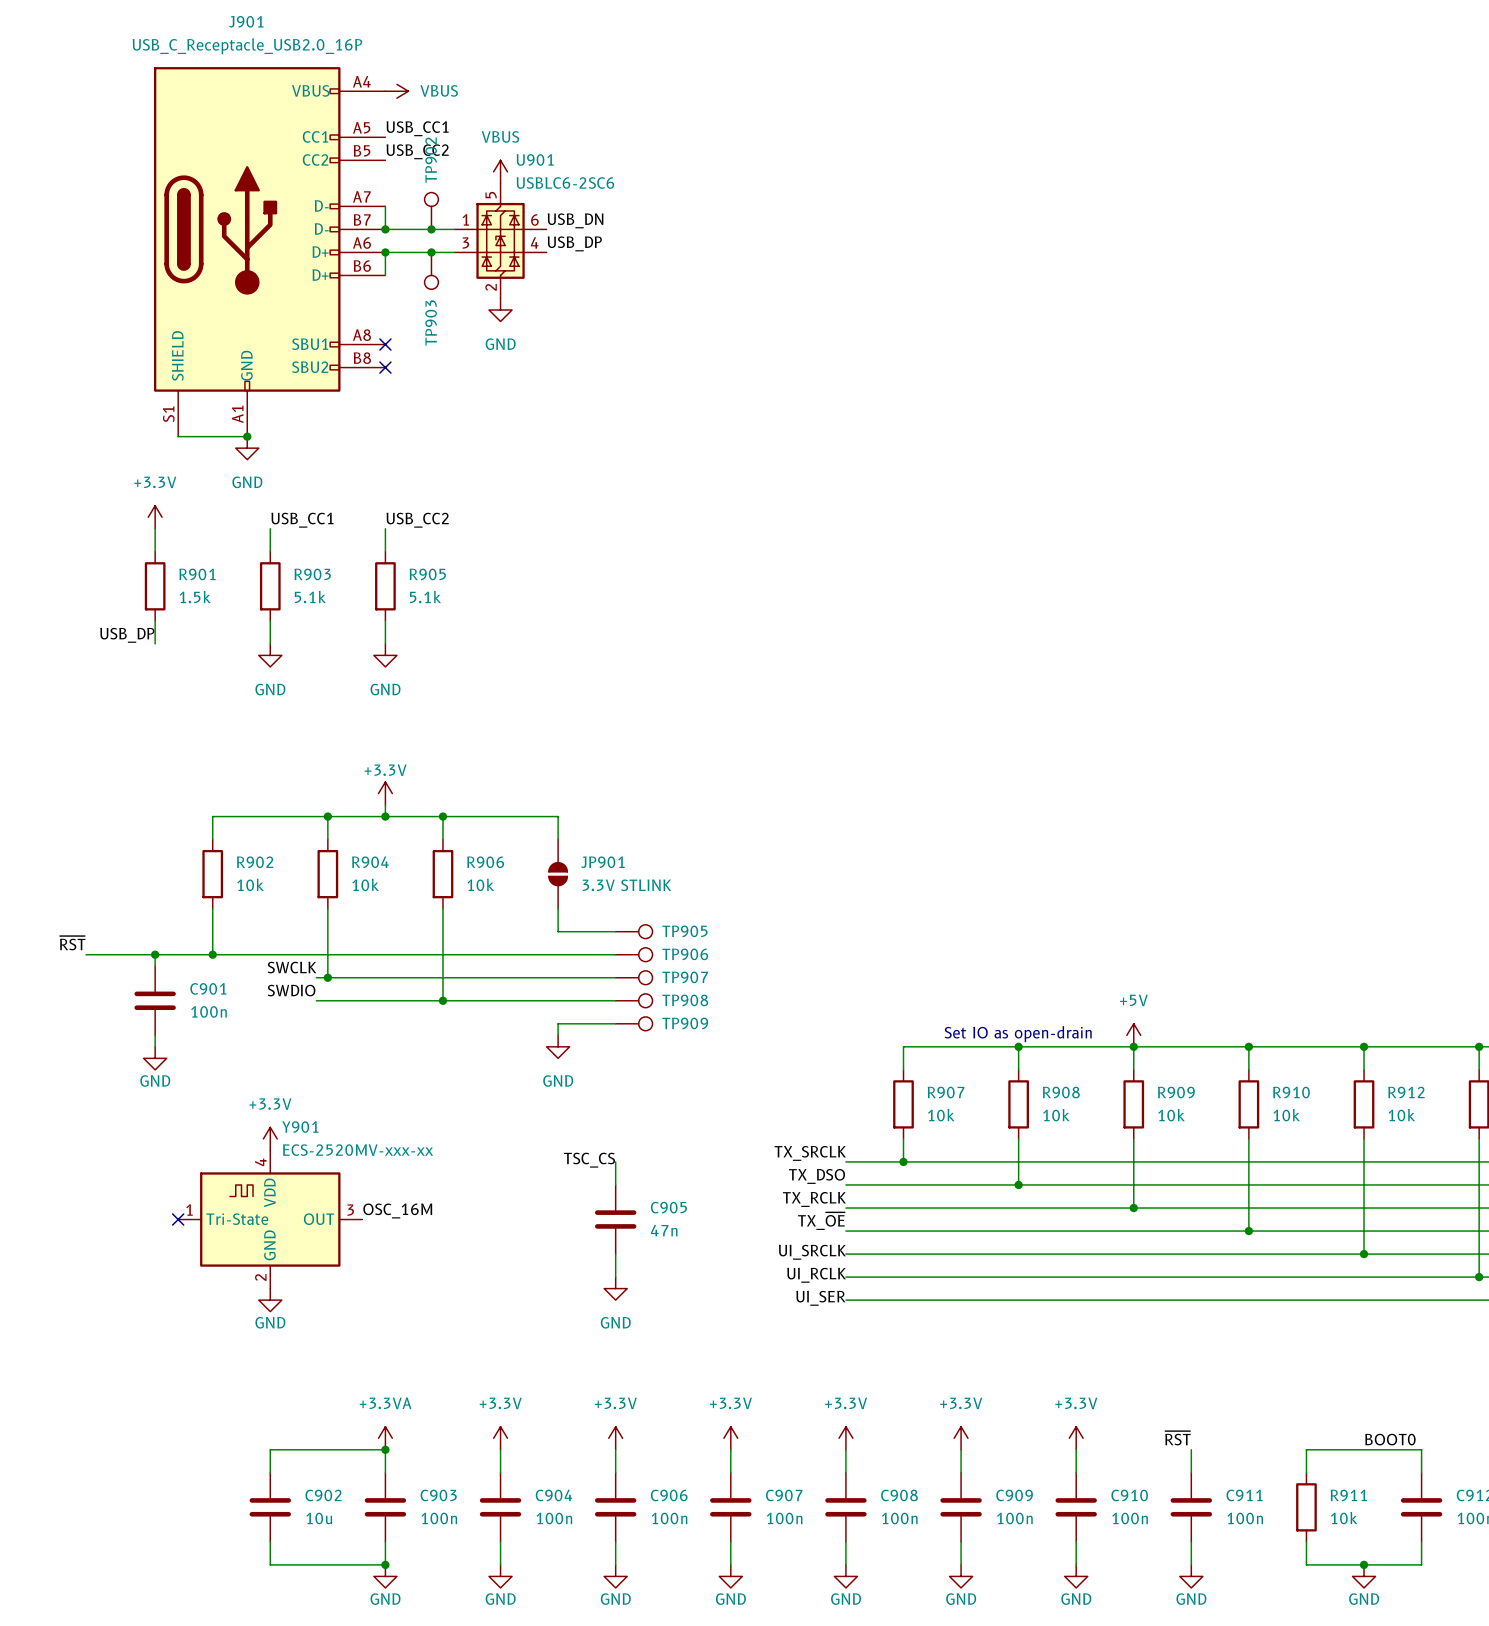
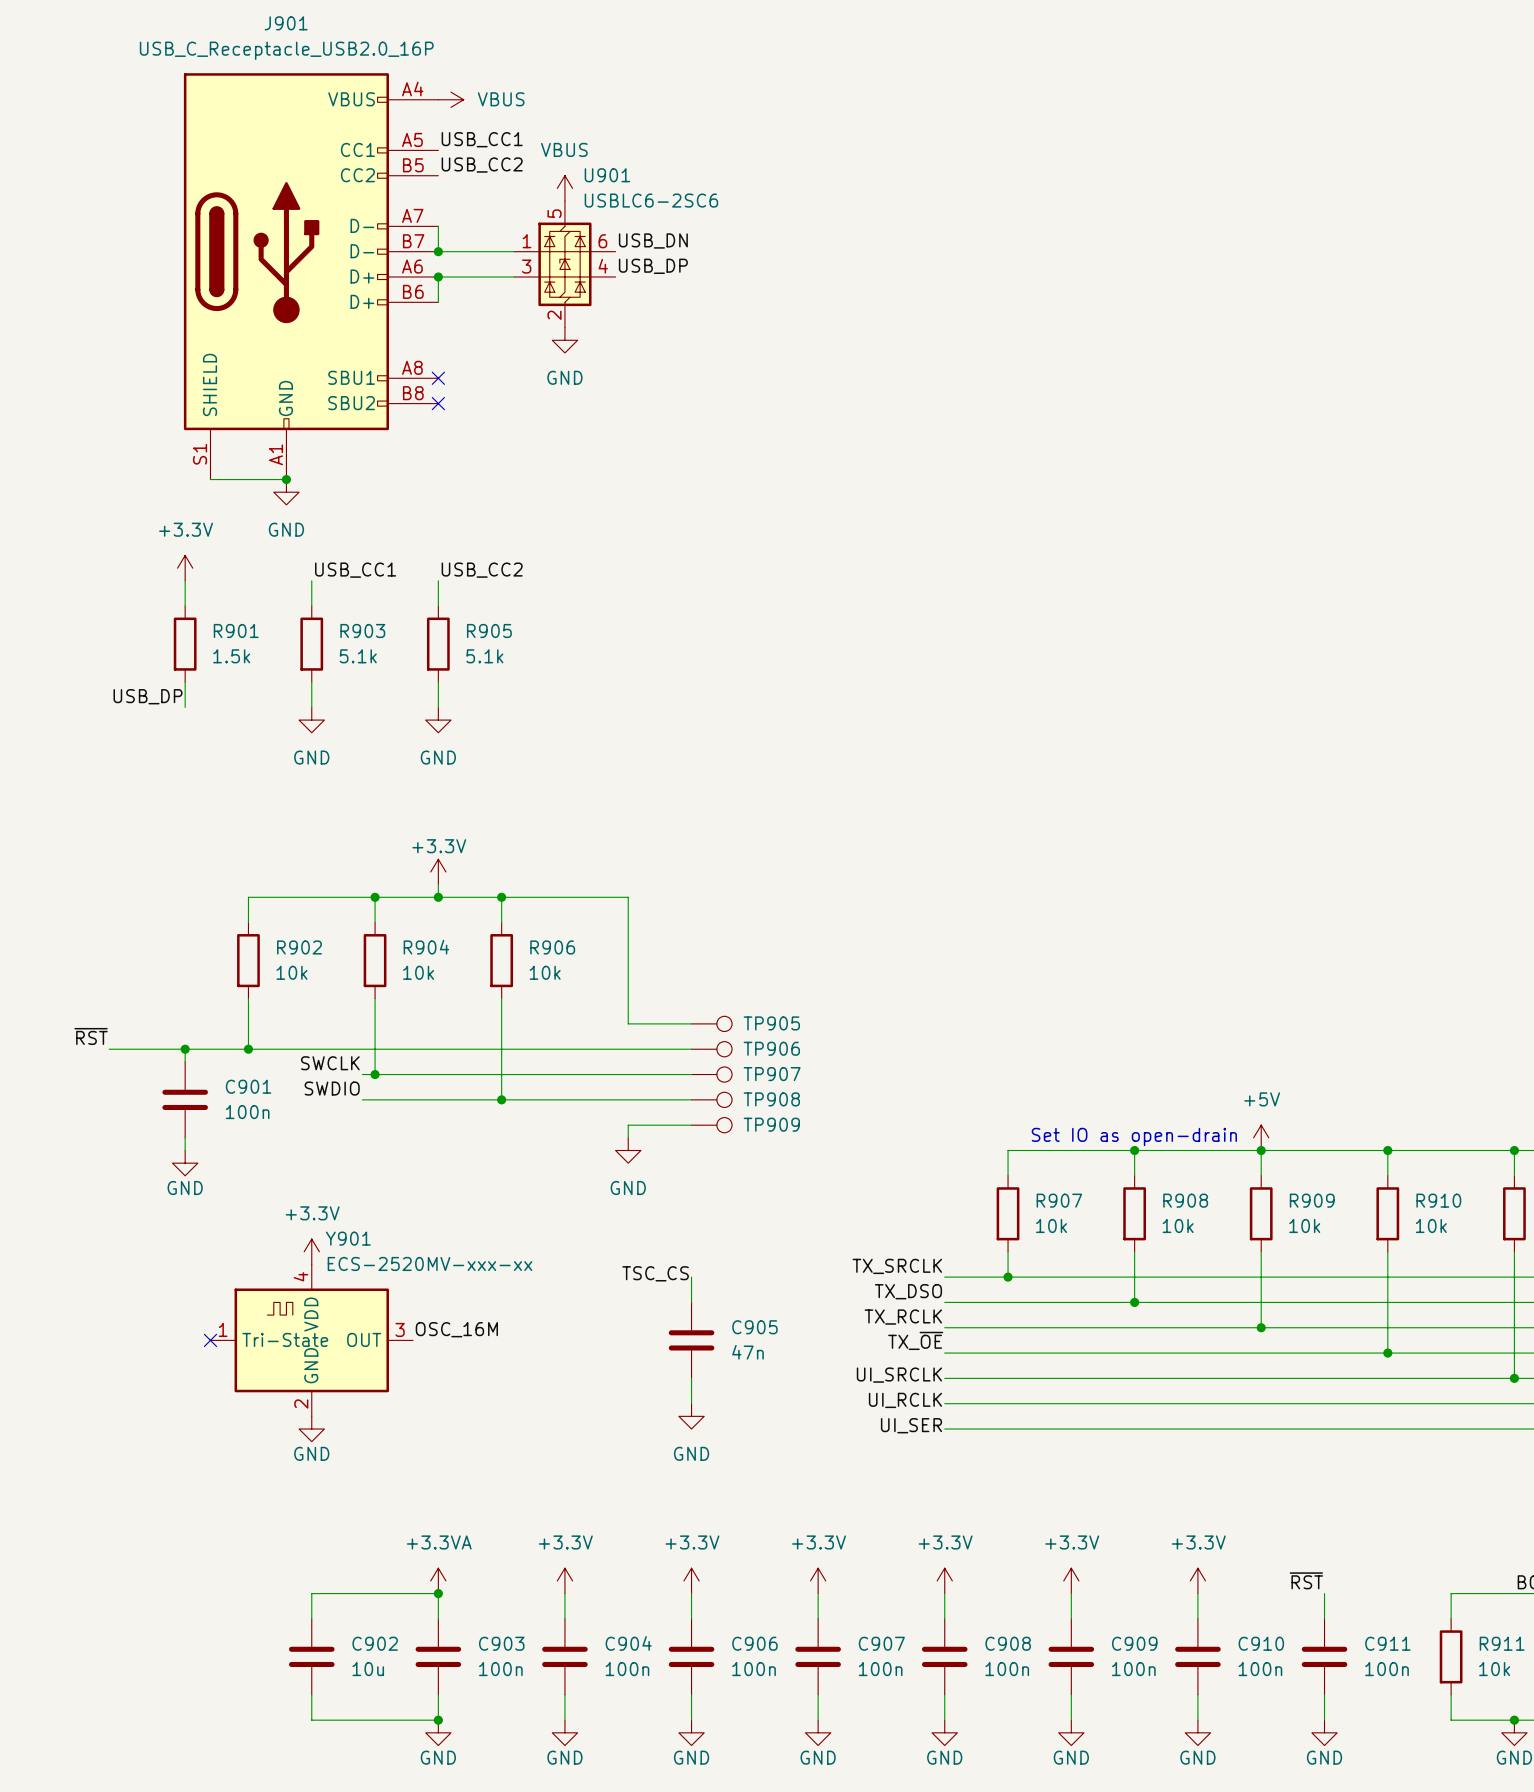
TP902: (431, 210) -> none
junction: (431, 229) -> none
junction: (431, 252) -> none
TP903: (431, 270) -> none
JP901: 3.3V STLINK (558, 874) -> none

